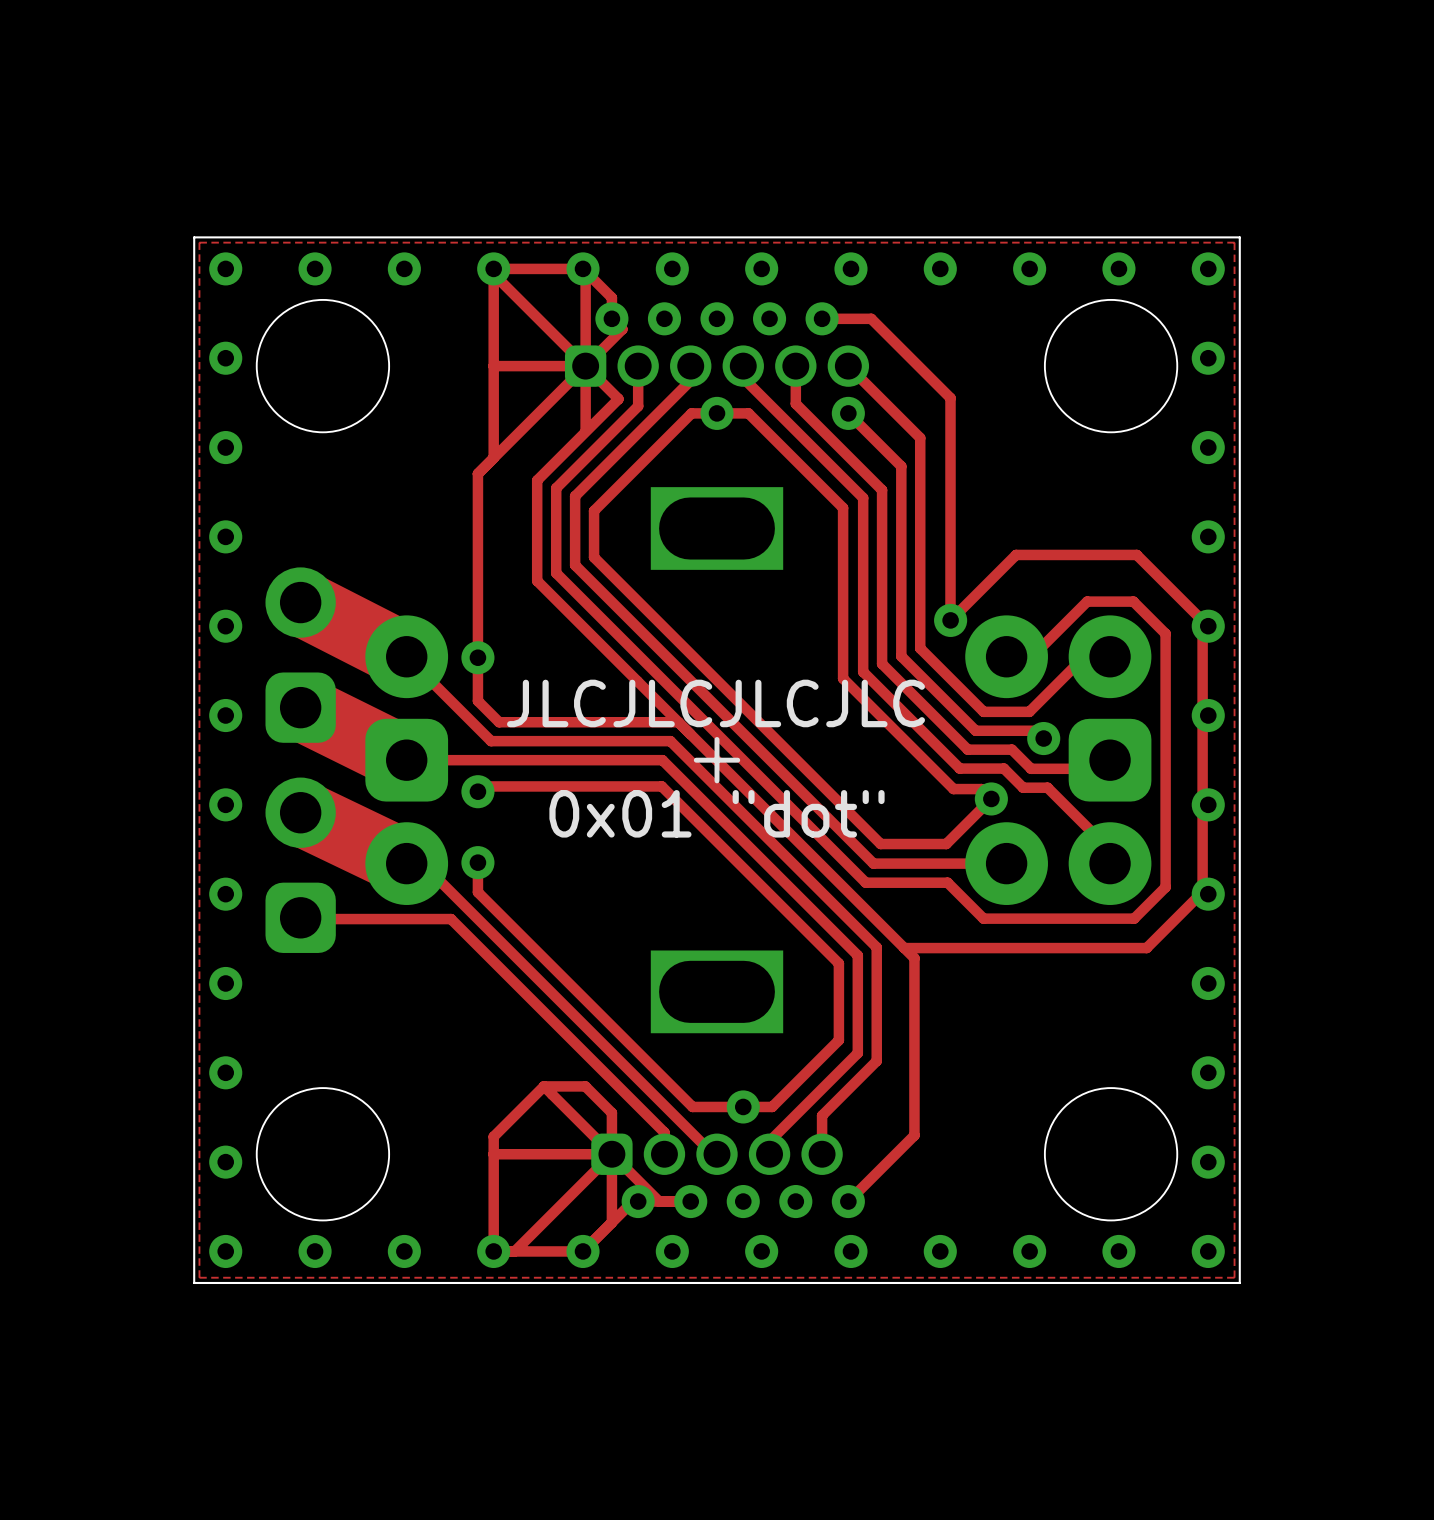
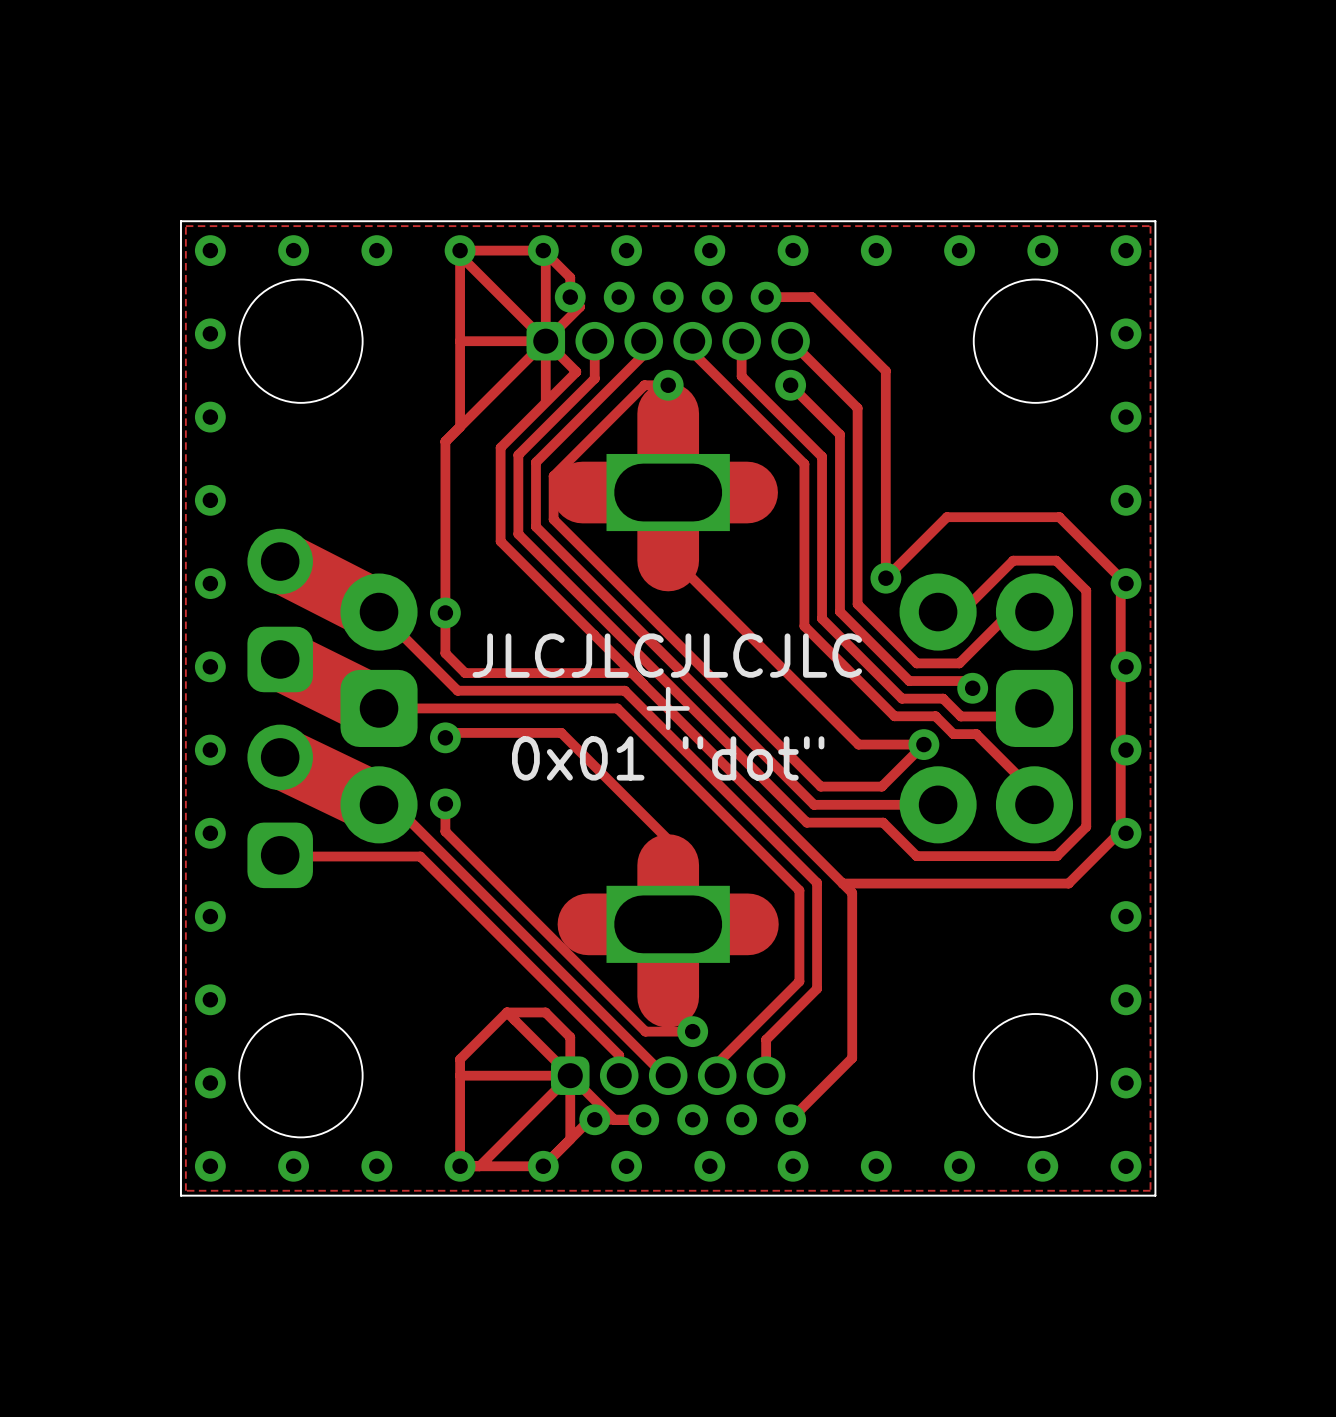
track: (717, 413) (748, 413) (843, 507) (843, 678) (953, 789) (981, 789) (991, 798) -> (668, 539) (668, 554) (858, 744) (923, 744)
track: none -> (668, 413) (668, 560)
track: none -> (582, 492) (747, 492)
track: (602, 786) (661, 786) (838, 963) (838, 1040) (772, 1106) (743, 1106) -> (561, 732) (668, 839) (668, 877)
track: none -> (668, 865) (668, 996)
track: none -> (588, 924) (747, 924)

